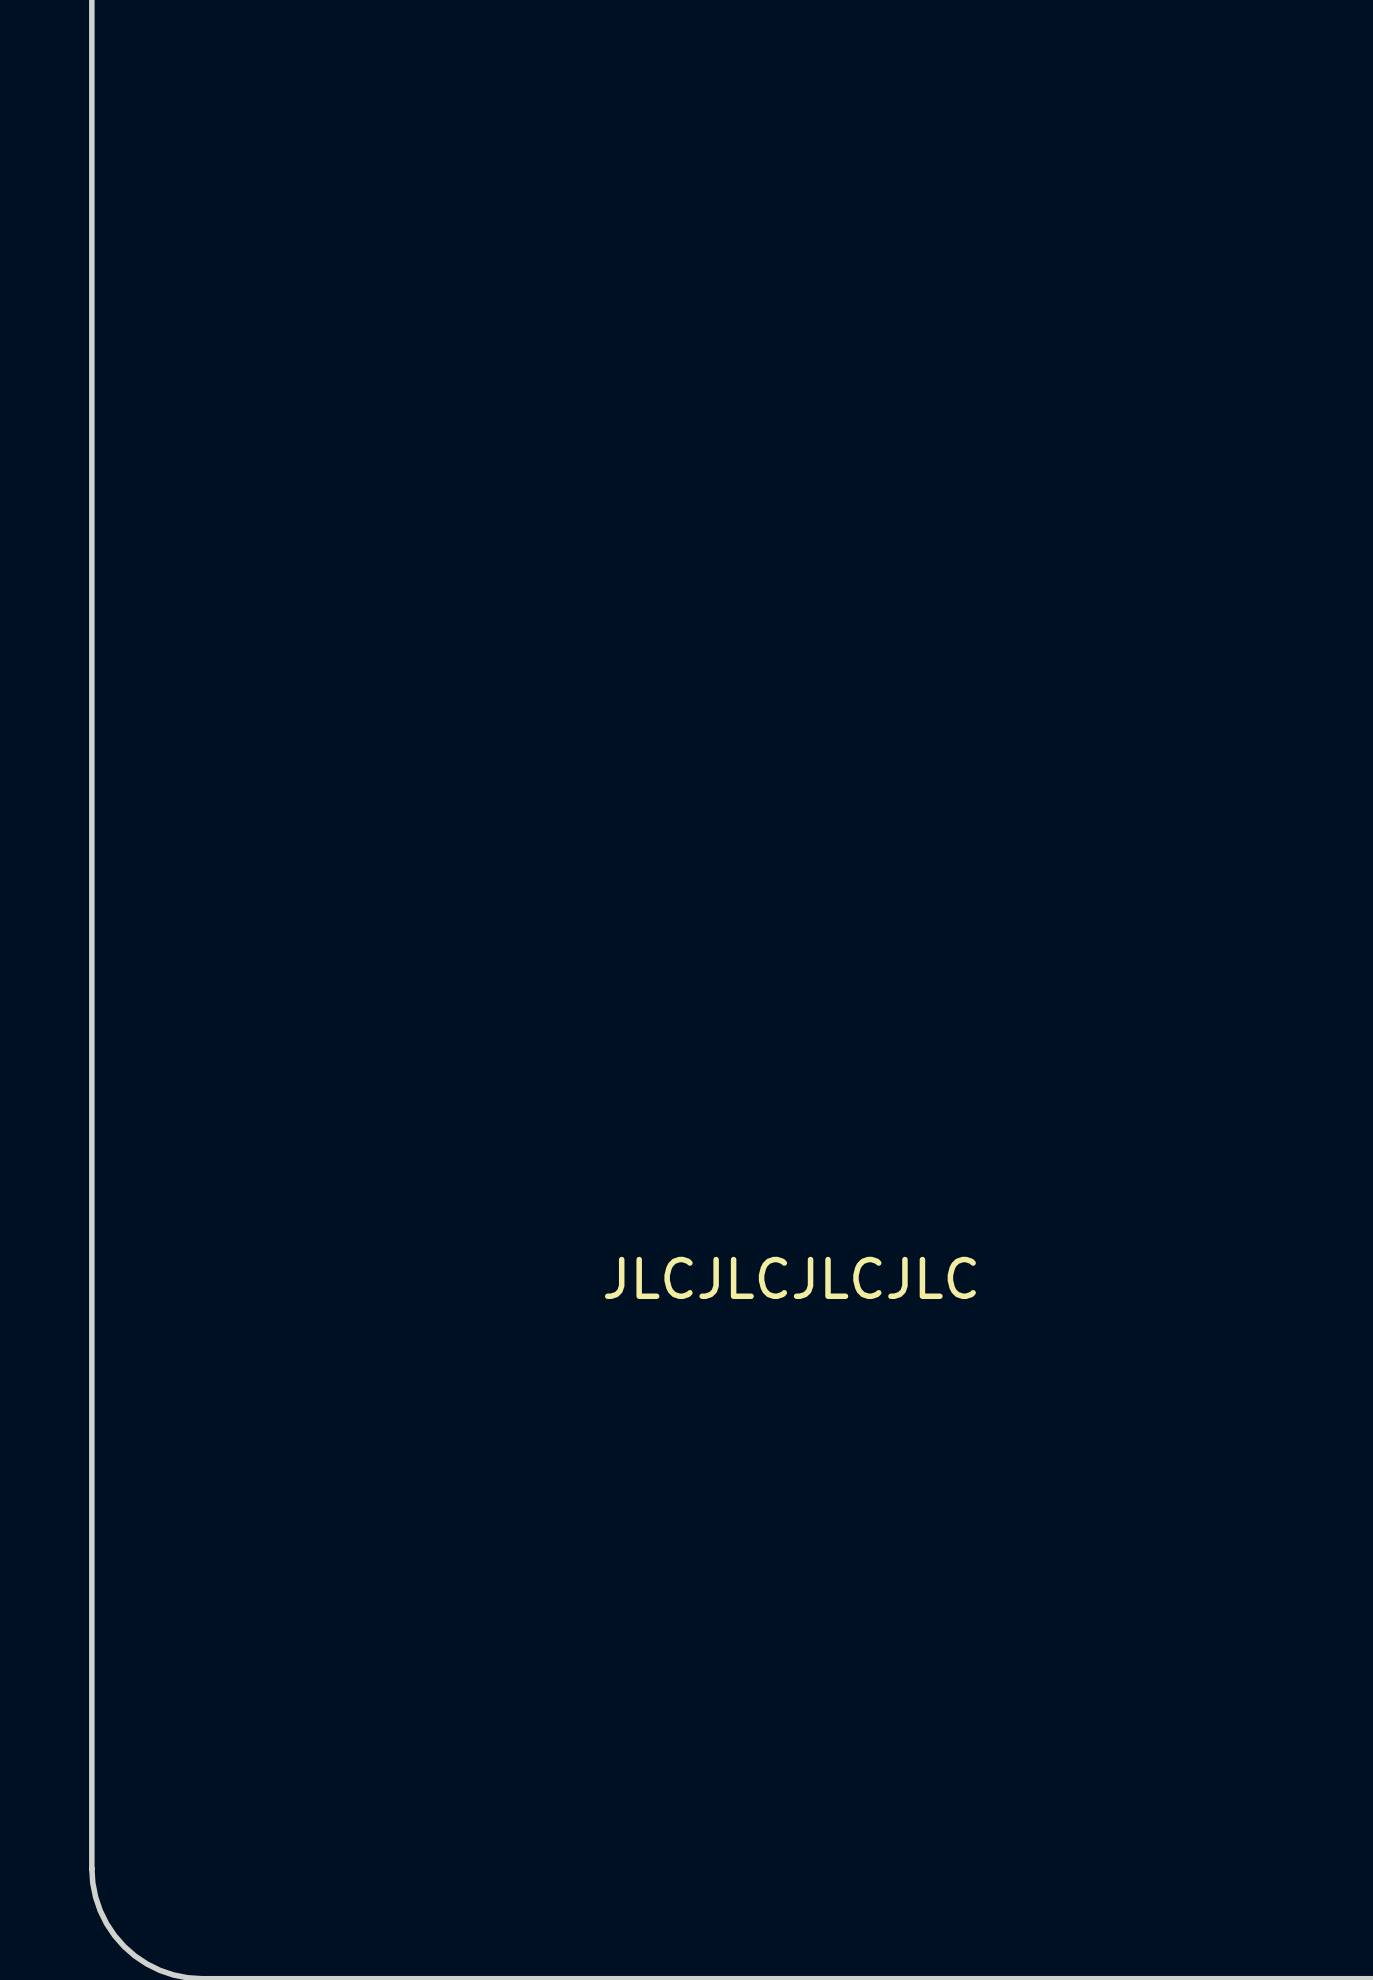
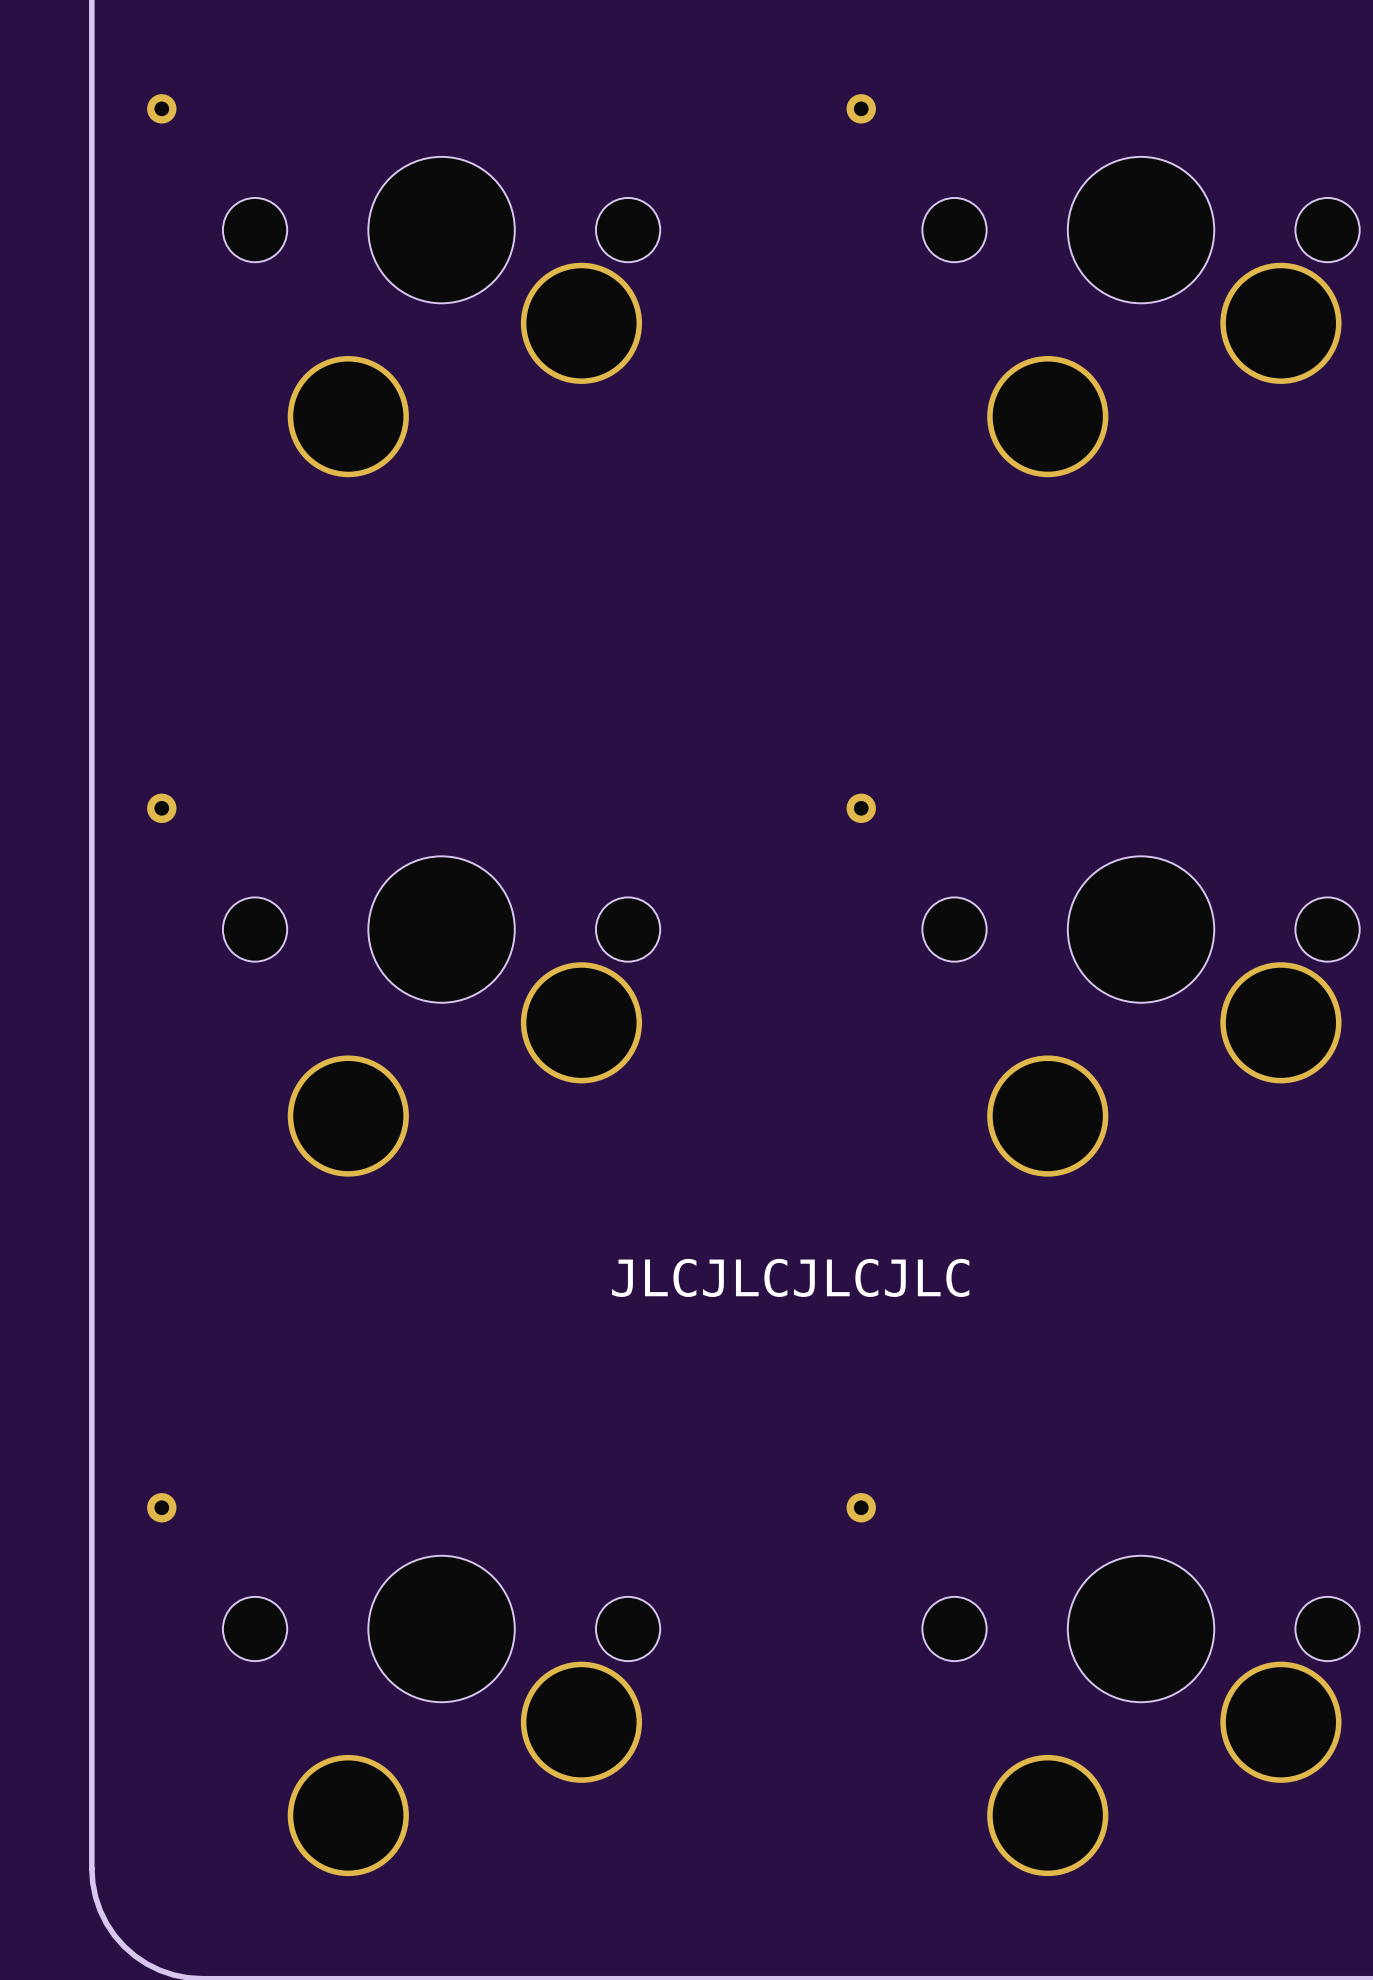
part: none -> (161, 108)
part: none -> (861, 108)
part: none -> (441, 317)
part: none -> (1141, 317)
part: none -> (161, 808)
part: none -> (861, 808)
part: none -> (441, 1016)
part: none -> (1141, 1016)
part: none -> (161, 1507)
part: none -> (861, 1507)
part: none -> (441, 1715)
part: none -> (1141, 1715)

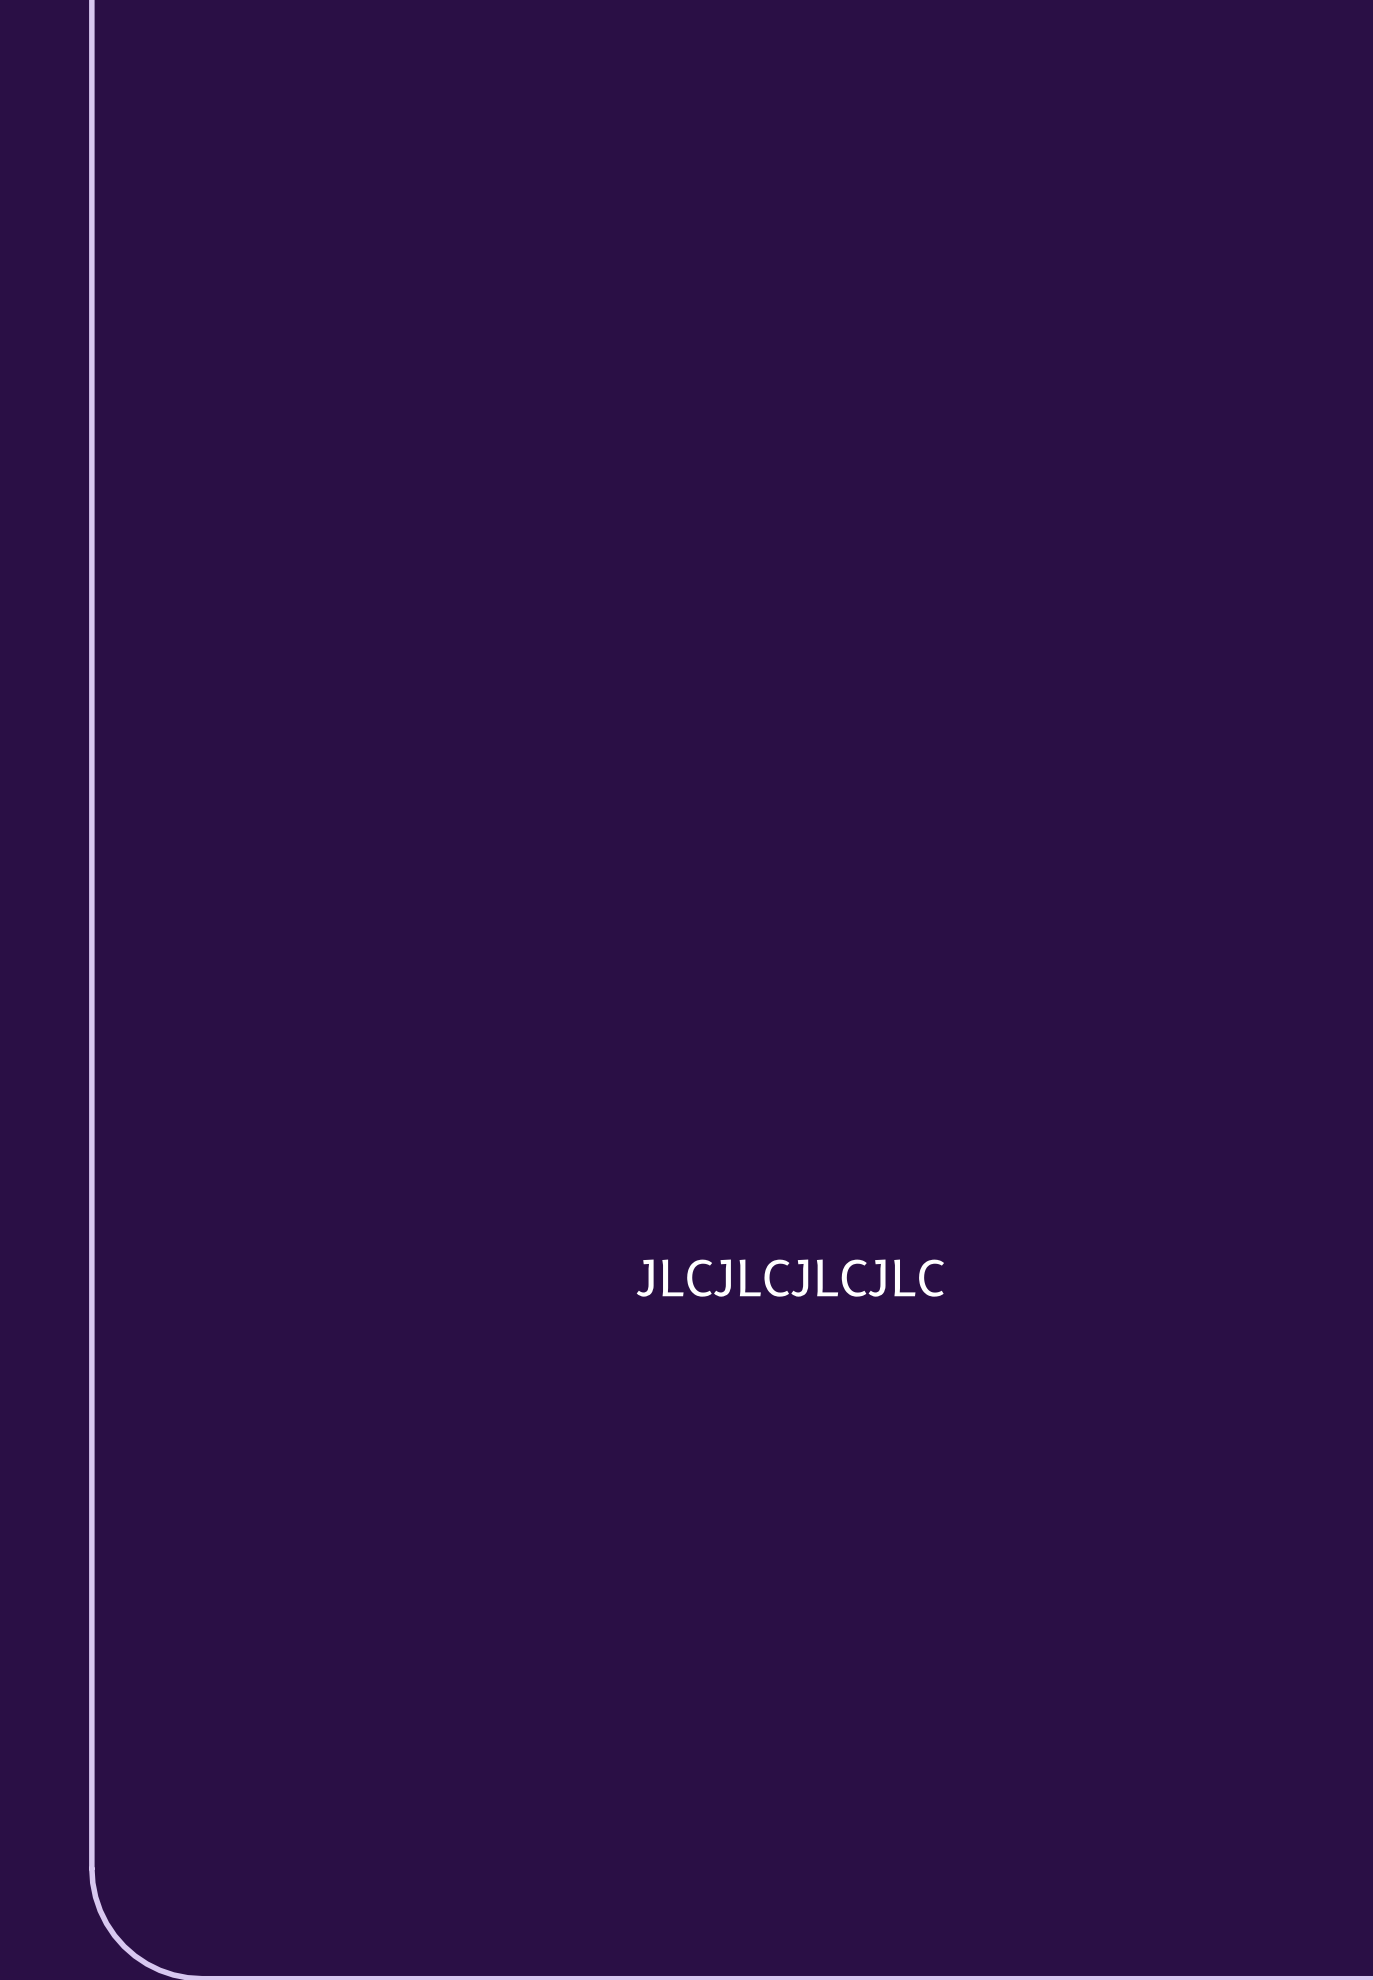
part: (161, 108) -> none
part: (861, 108) -> none
part: (441, 317) -> none
part: (1141, 317) -> none
part: (161, 808) -> none
part: (861, 808) -> none
part: (441, 1016) -> none
part: (1141, 1016) -> none
part: (161, 1507) -> none
part: (861, 1507) -> none
part: (441, 1715) -> none
part: (1141, 1715) -> none

